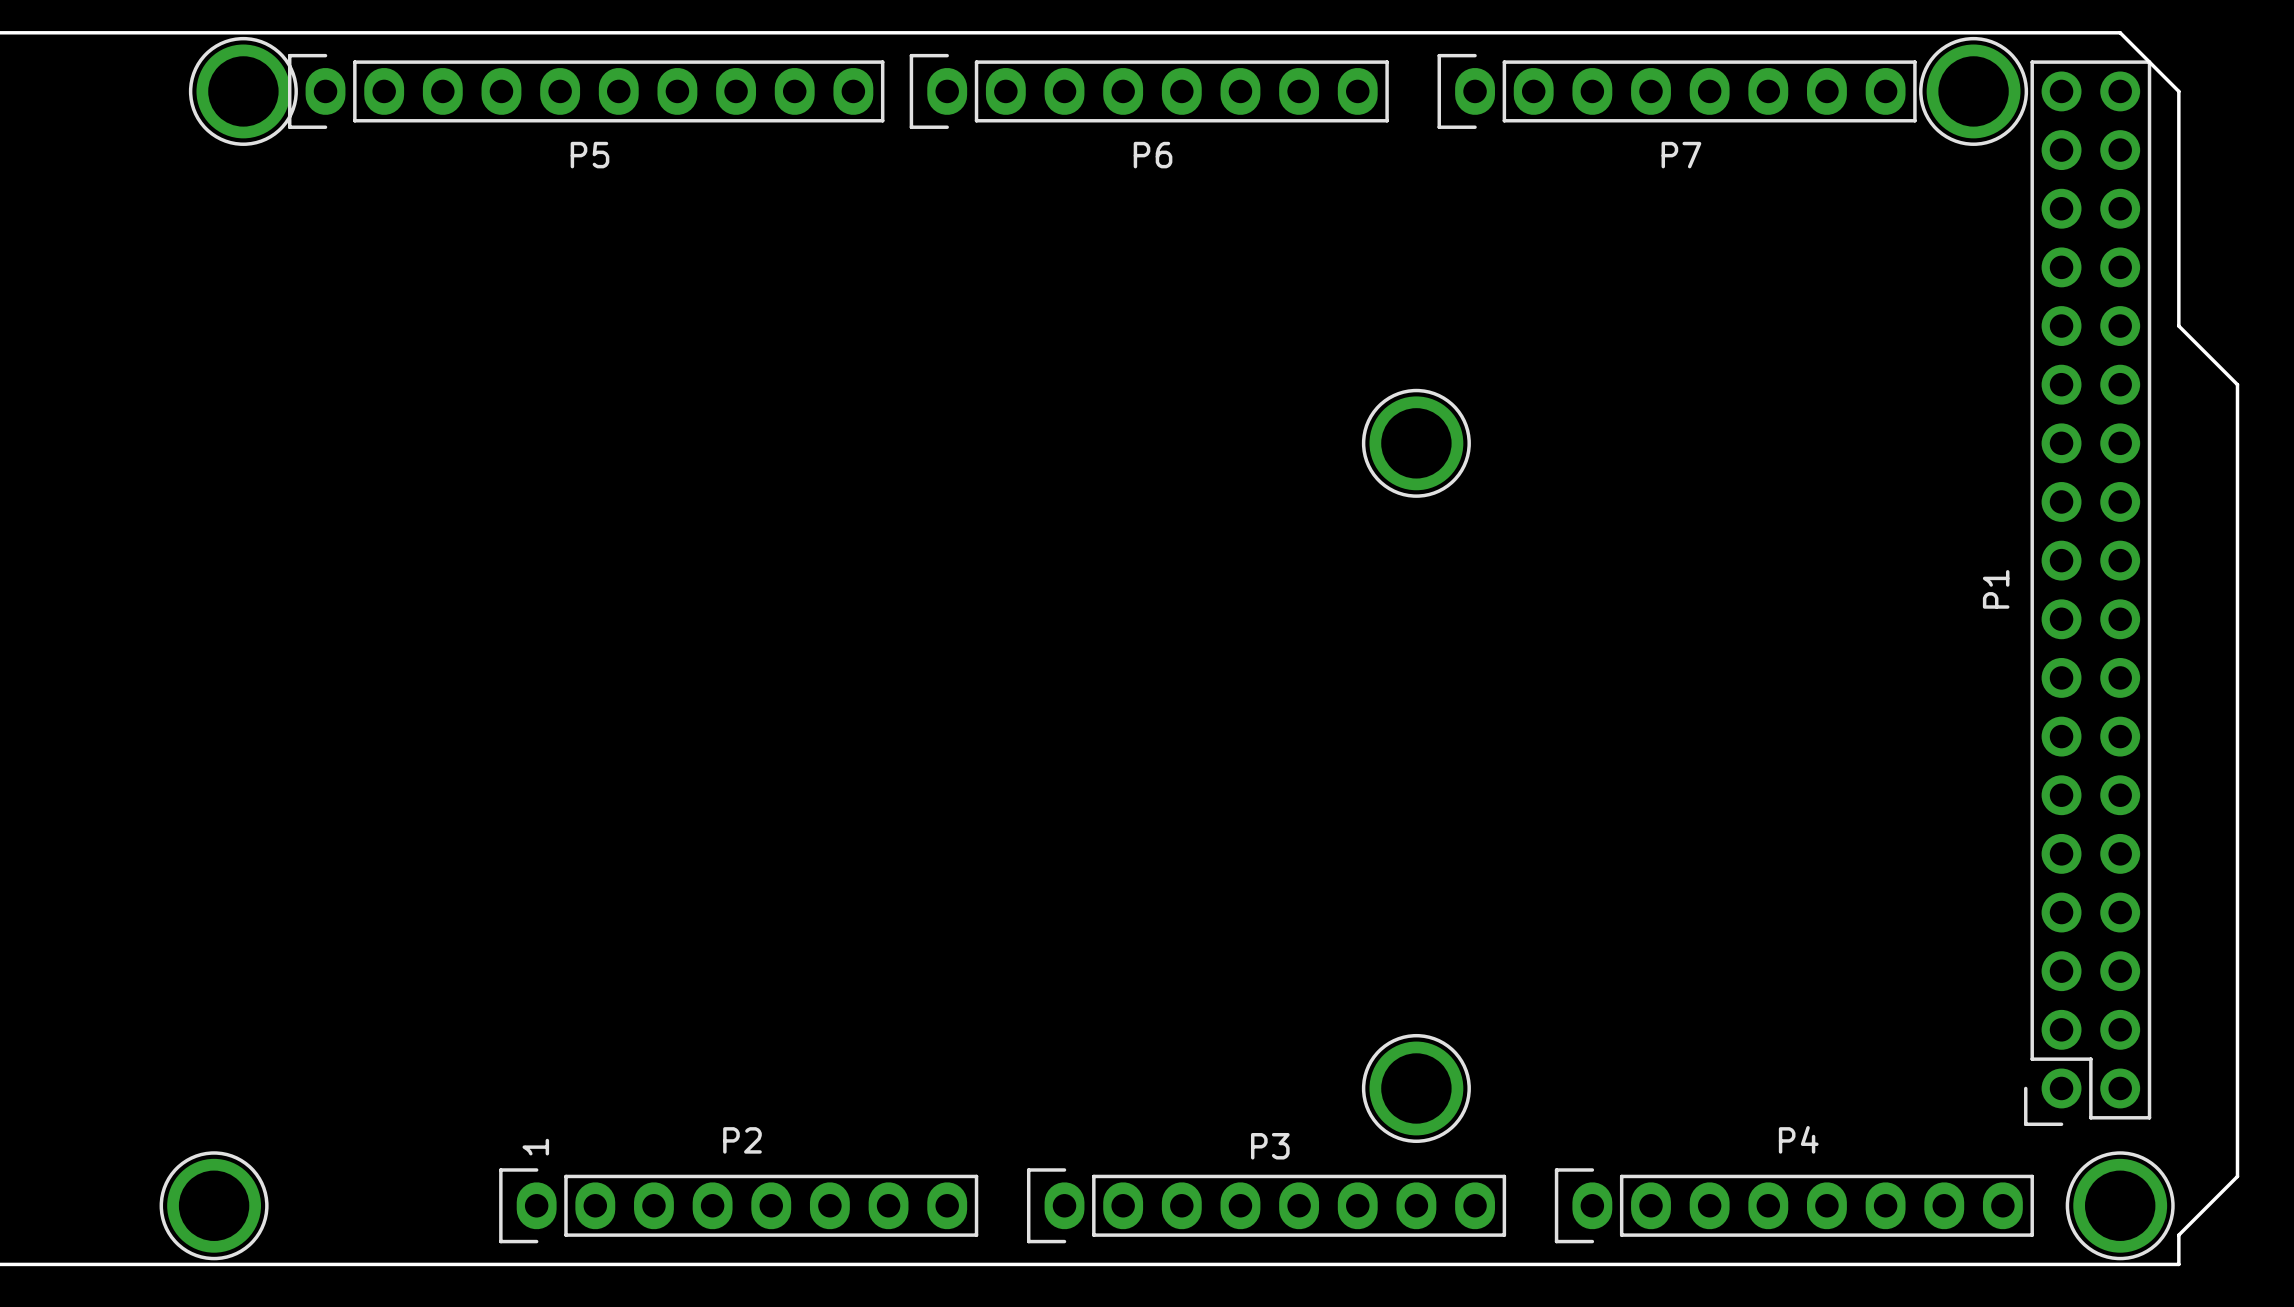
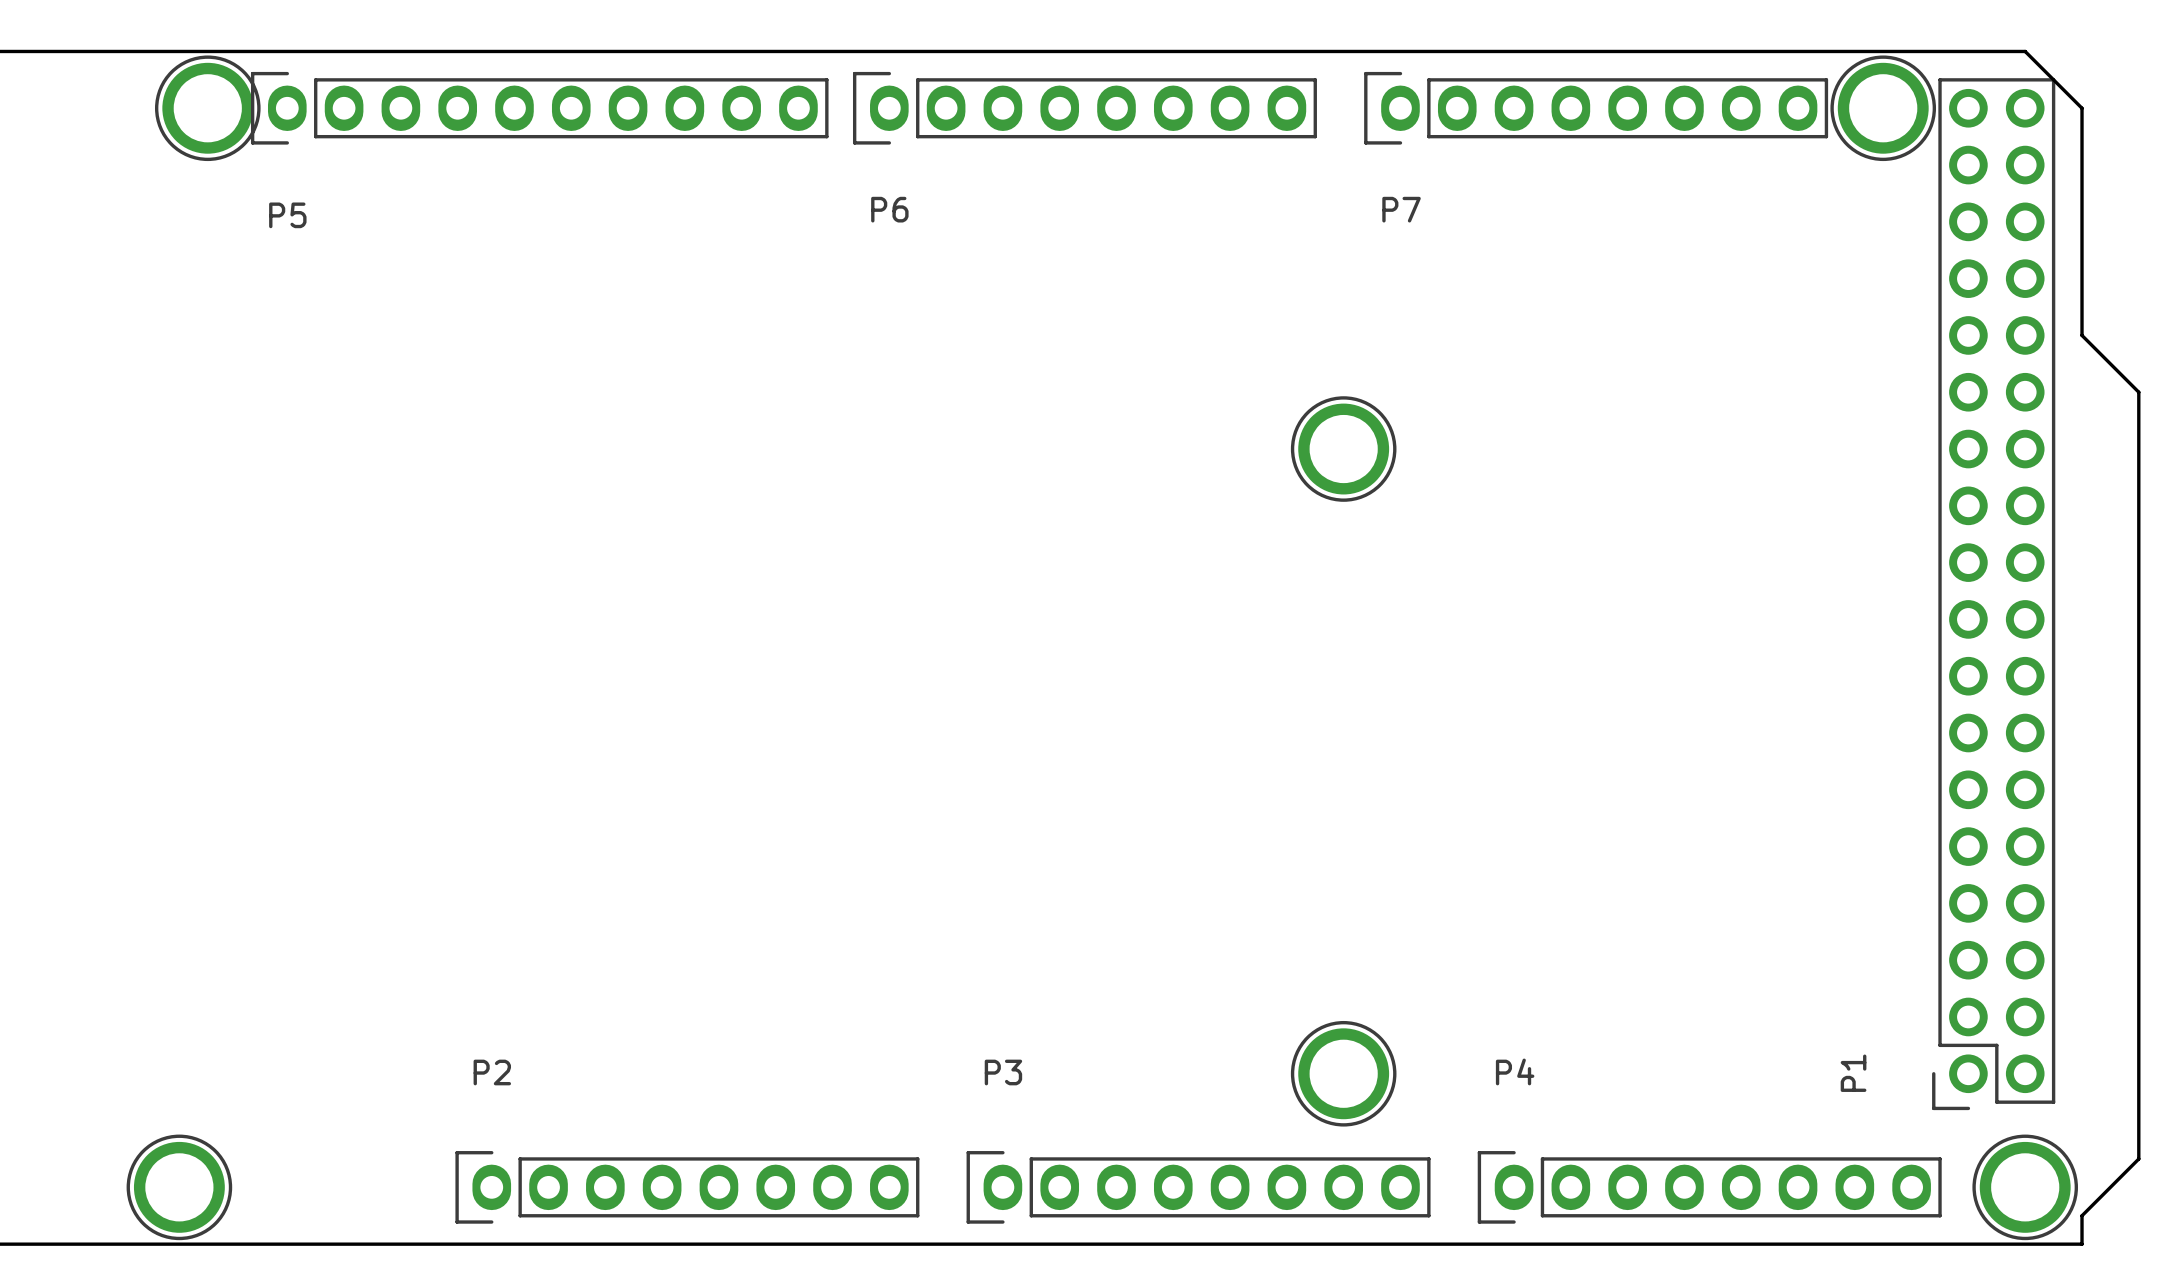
P5 name position: P5 (589, 155) -> P5 (287, 215)
P6 name position: P6 (1153, 155) -> P6 (889, 209)
P7 name position: P7 (1681, 155) -> P7 (1401, 209)
P1 name position: P1 (1996, 589) -> P1 (1853, 1073)
P4 name position: P4 (1798, 1139) -> P4 (1515, 1071)
P2 name position: P2 (742, 1140) -> P2 (492, 1072)
P3 name position: P3 (1270, 1146) -> P3 (1003, 1072)
text: 1 (535, 1147) -> none

